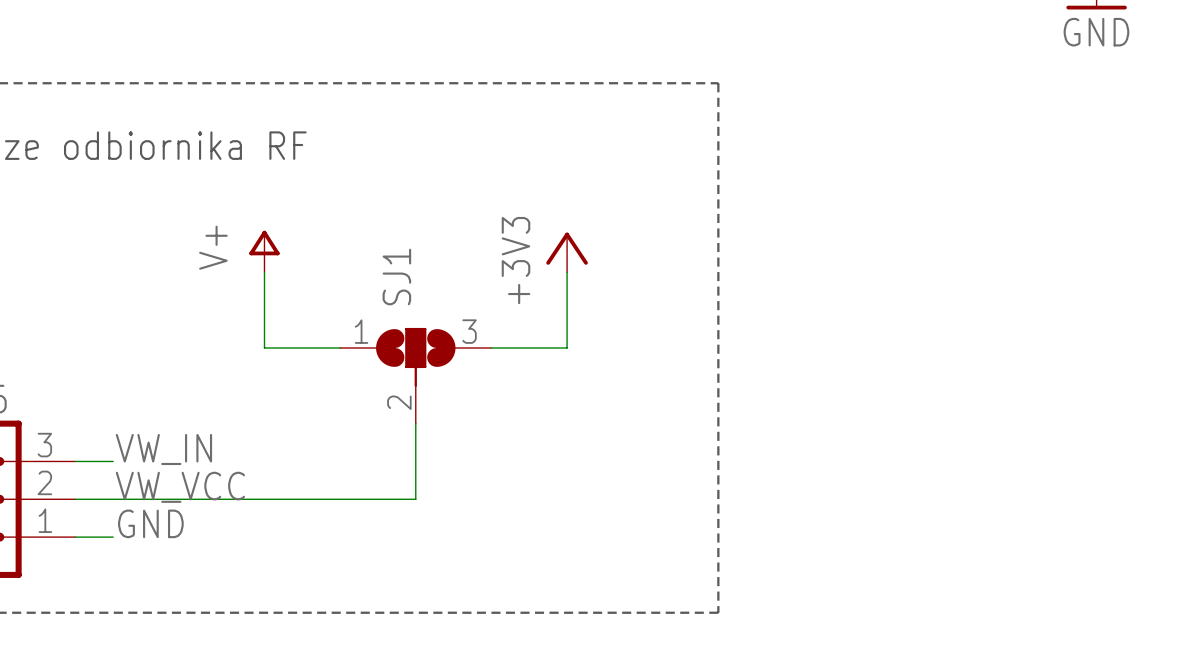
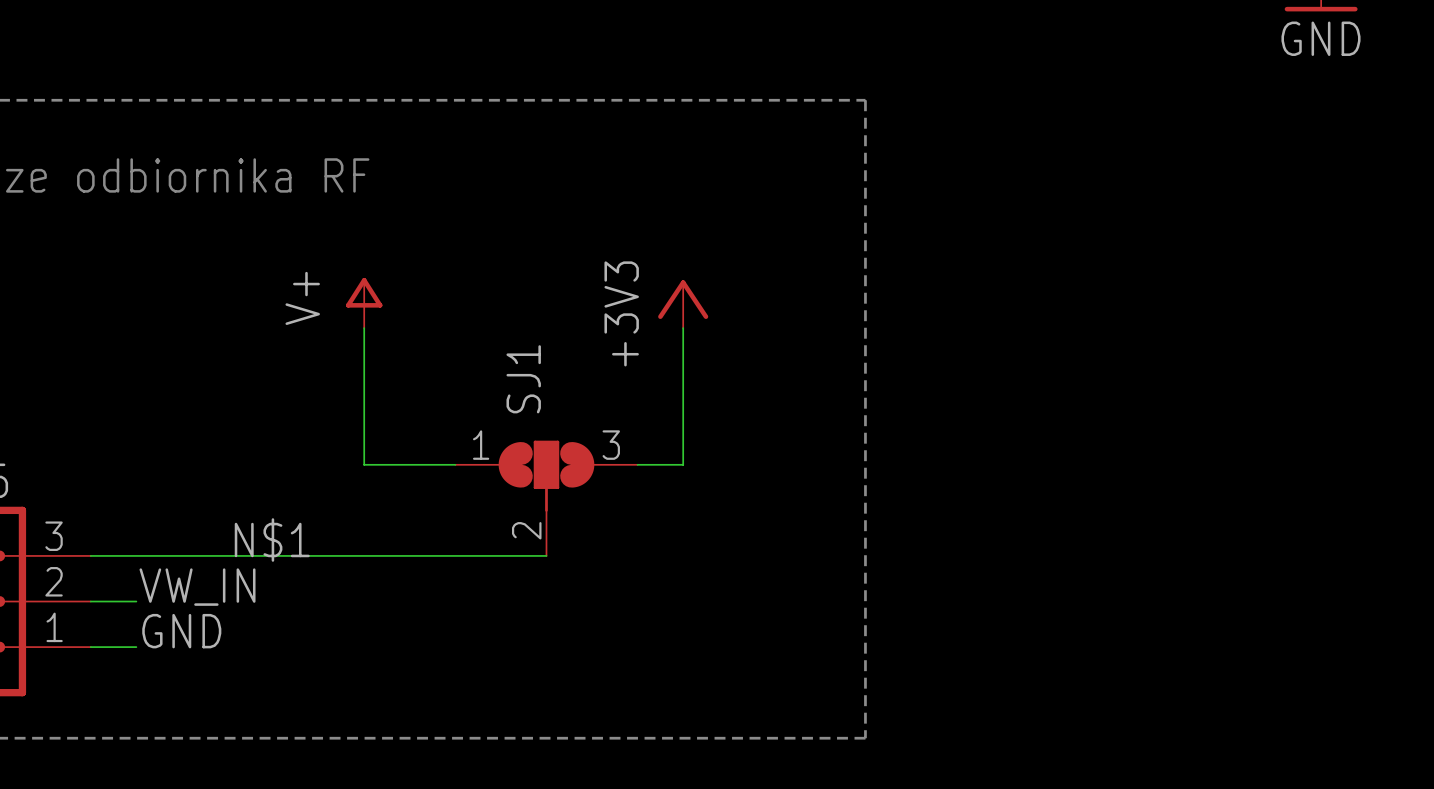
power symbol position: V+ (264, 251) -> V+ (364, 303)
wire: (264, 272) (264, 347) (340, 347) -> none
wire: none -> (364, 328) (364, 464) (455, 464)
wire: (491, 347) (567, 347) -> (637, 464) (683, 464) (683, 419)
SJ1 position: (415, 375) -> (546, 498)
wire: (415, 423) (415, 499) (113, 499) -> none
label: none -> N$1 (272, 540)
label: VW_IN (163, 449) -> none
wire: none -> (136, 555) (546, 555)
label: VW_VCC (180, 487) -> VW_IN (197, 587)

